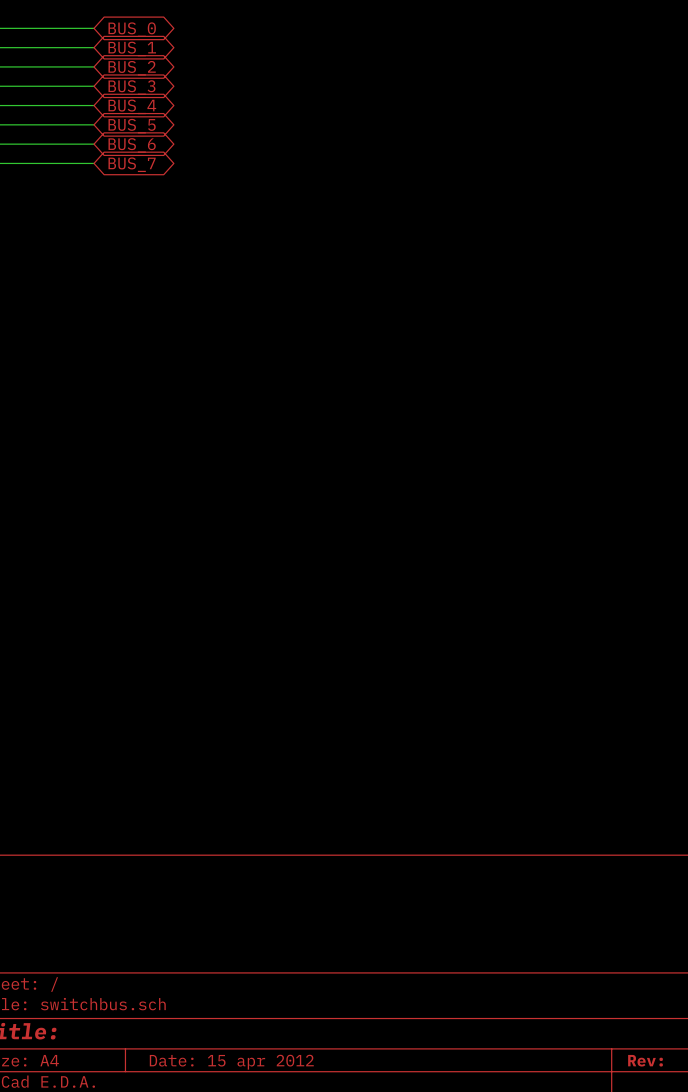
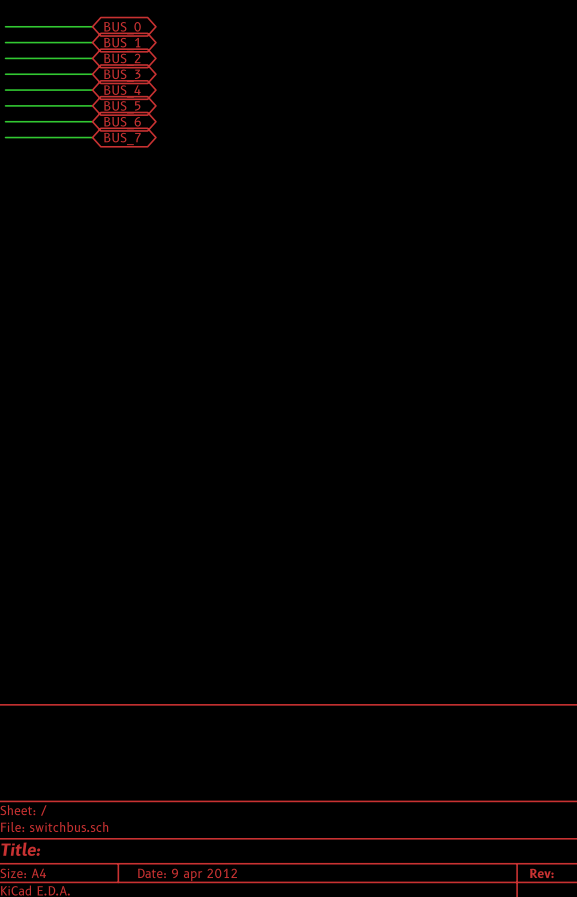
title block: Date: 15 apr 2012 (231, 1062) -> Date: 9 apr 2012 (187, 874)

